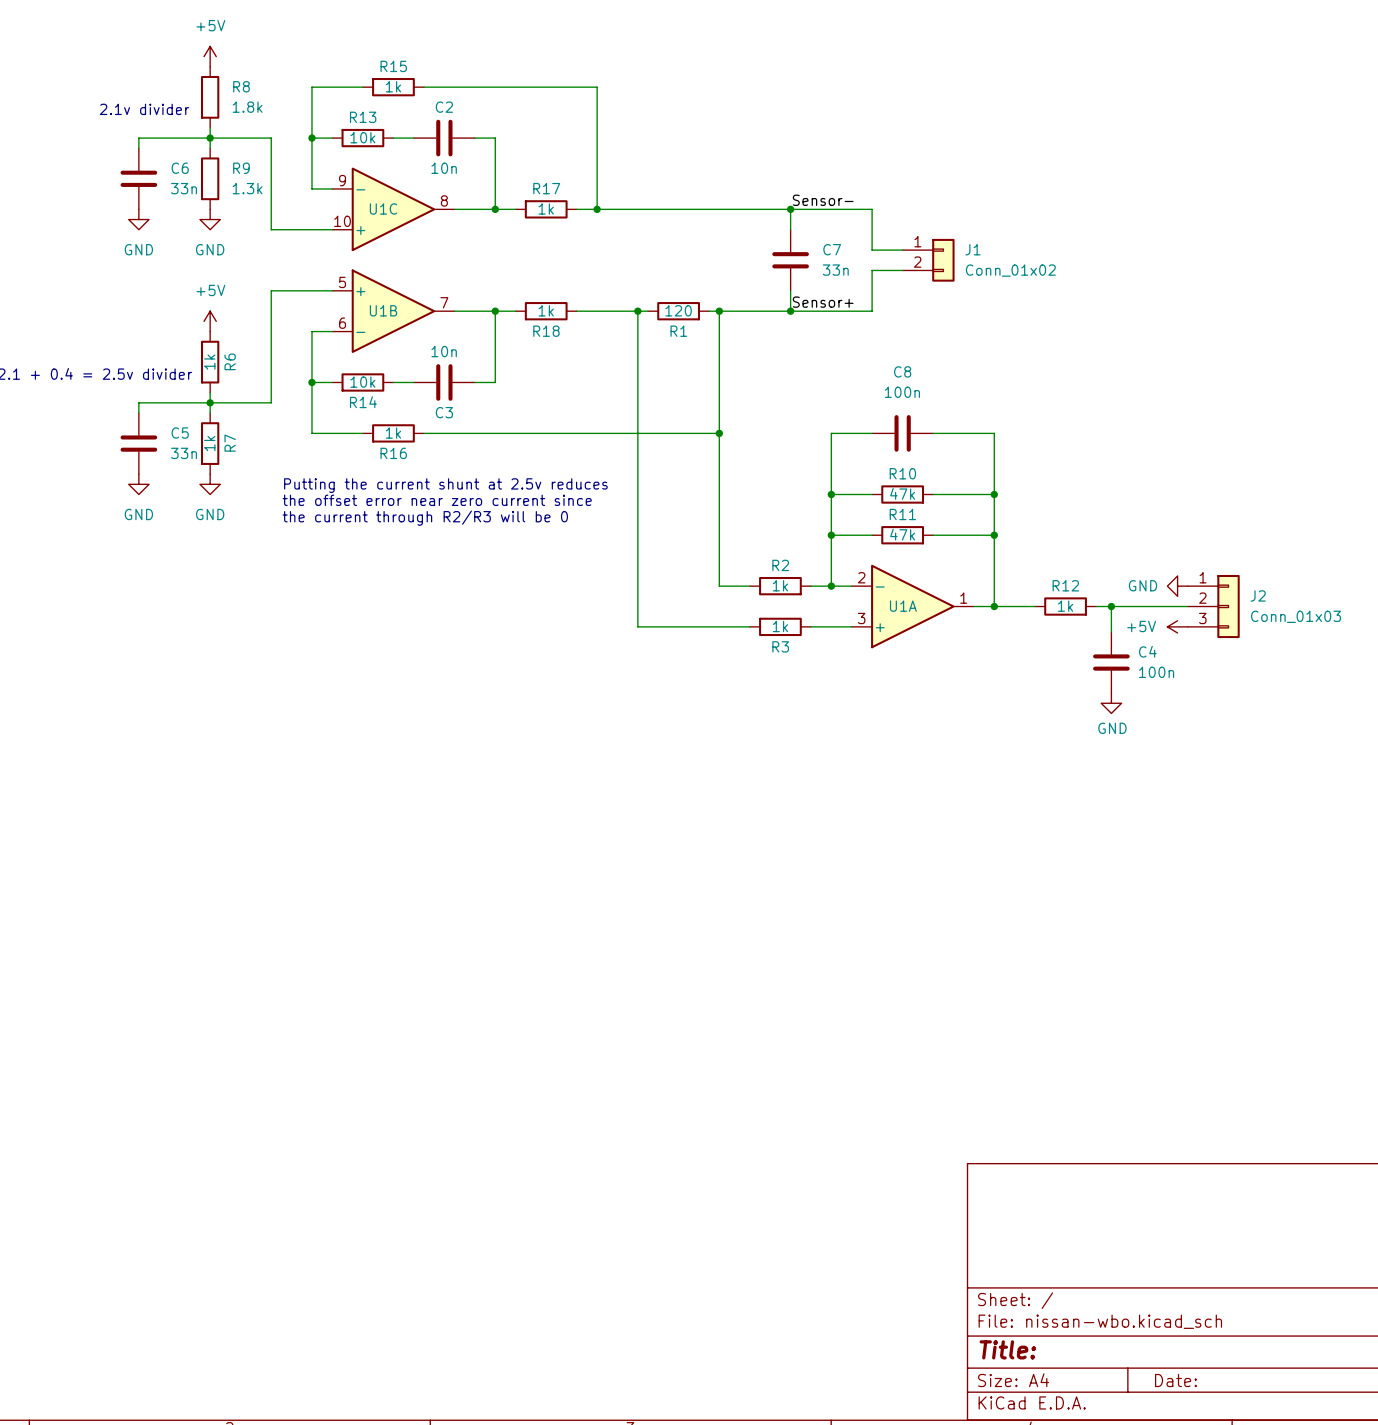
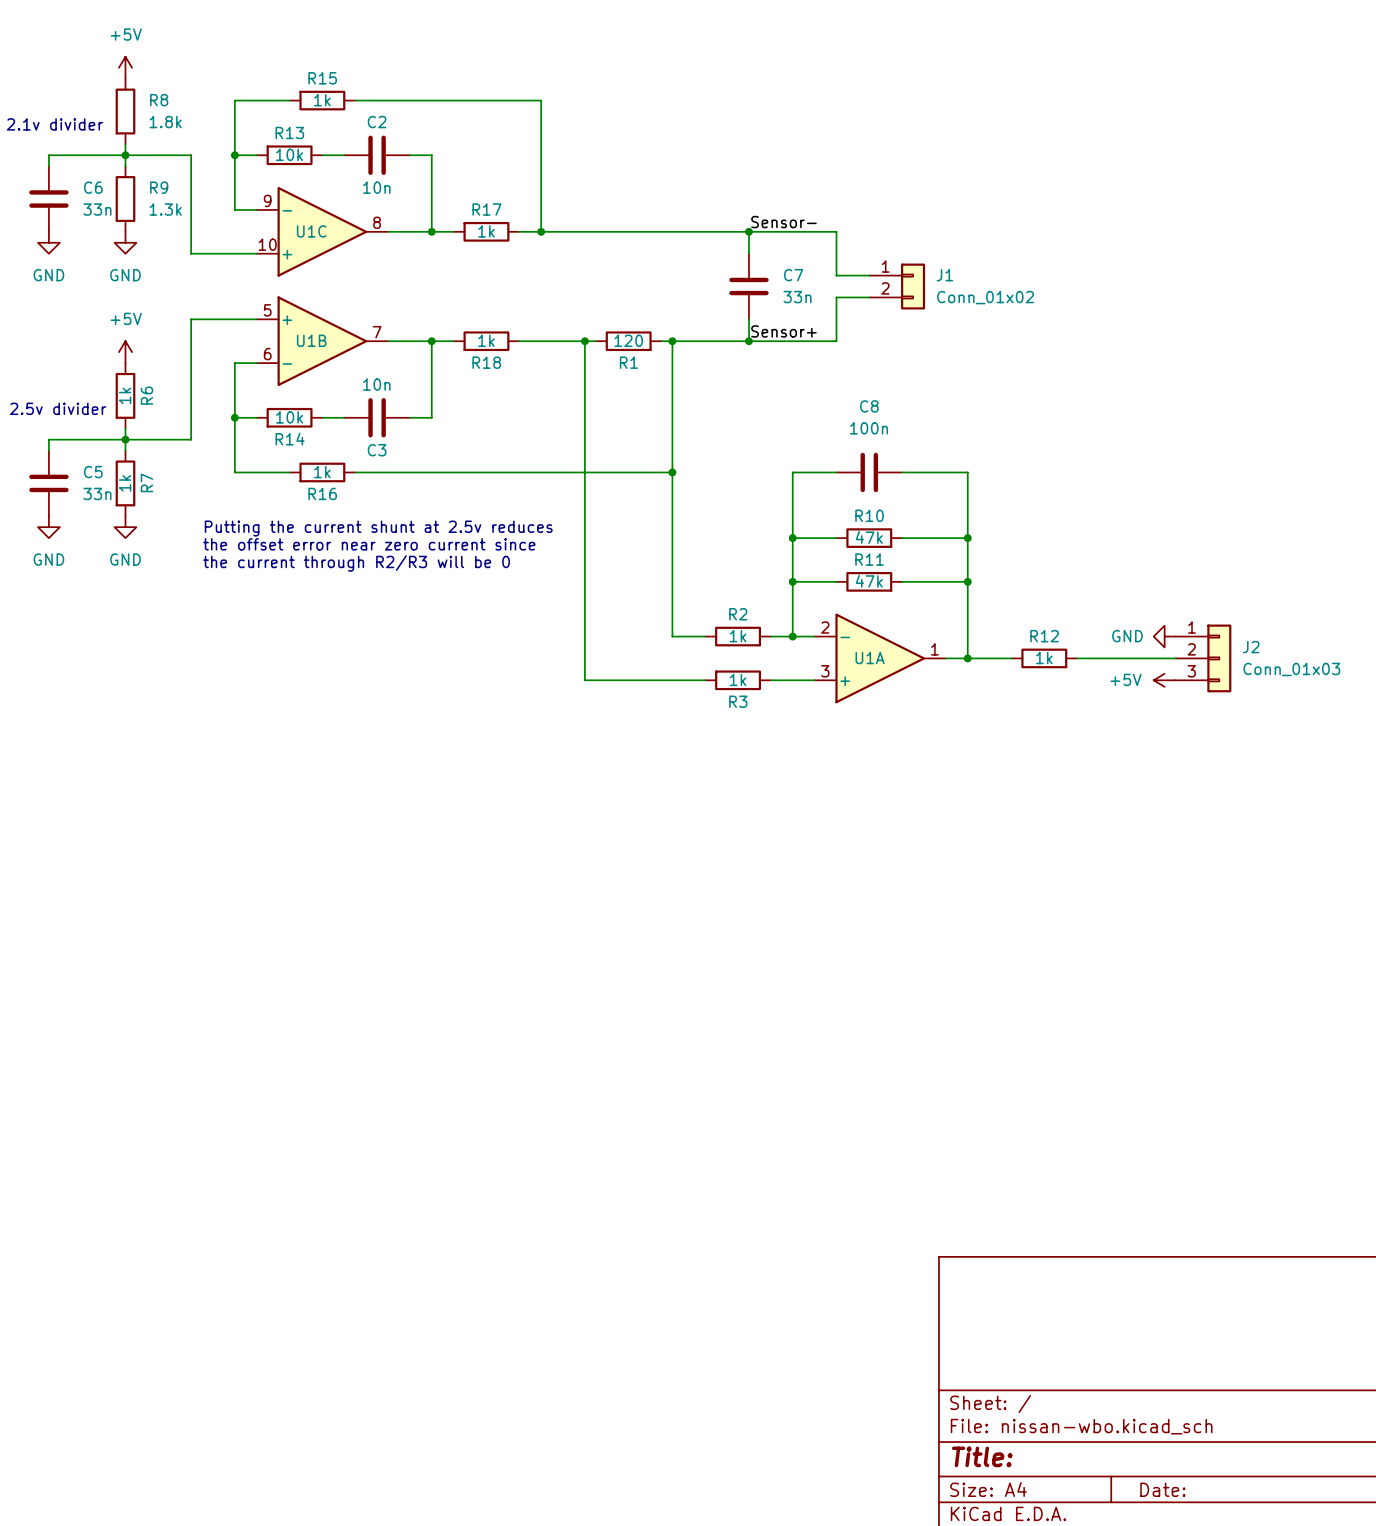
wire: (1111, 606) (1111, 631) -> none
junction: (1111, 606) -> none
C4: 100n (1111, 662) -> none
power symbol: GND (1111, 703) -> none

